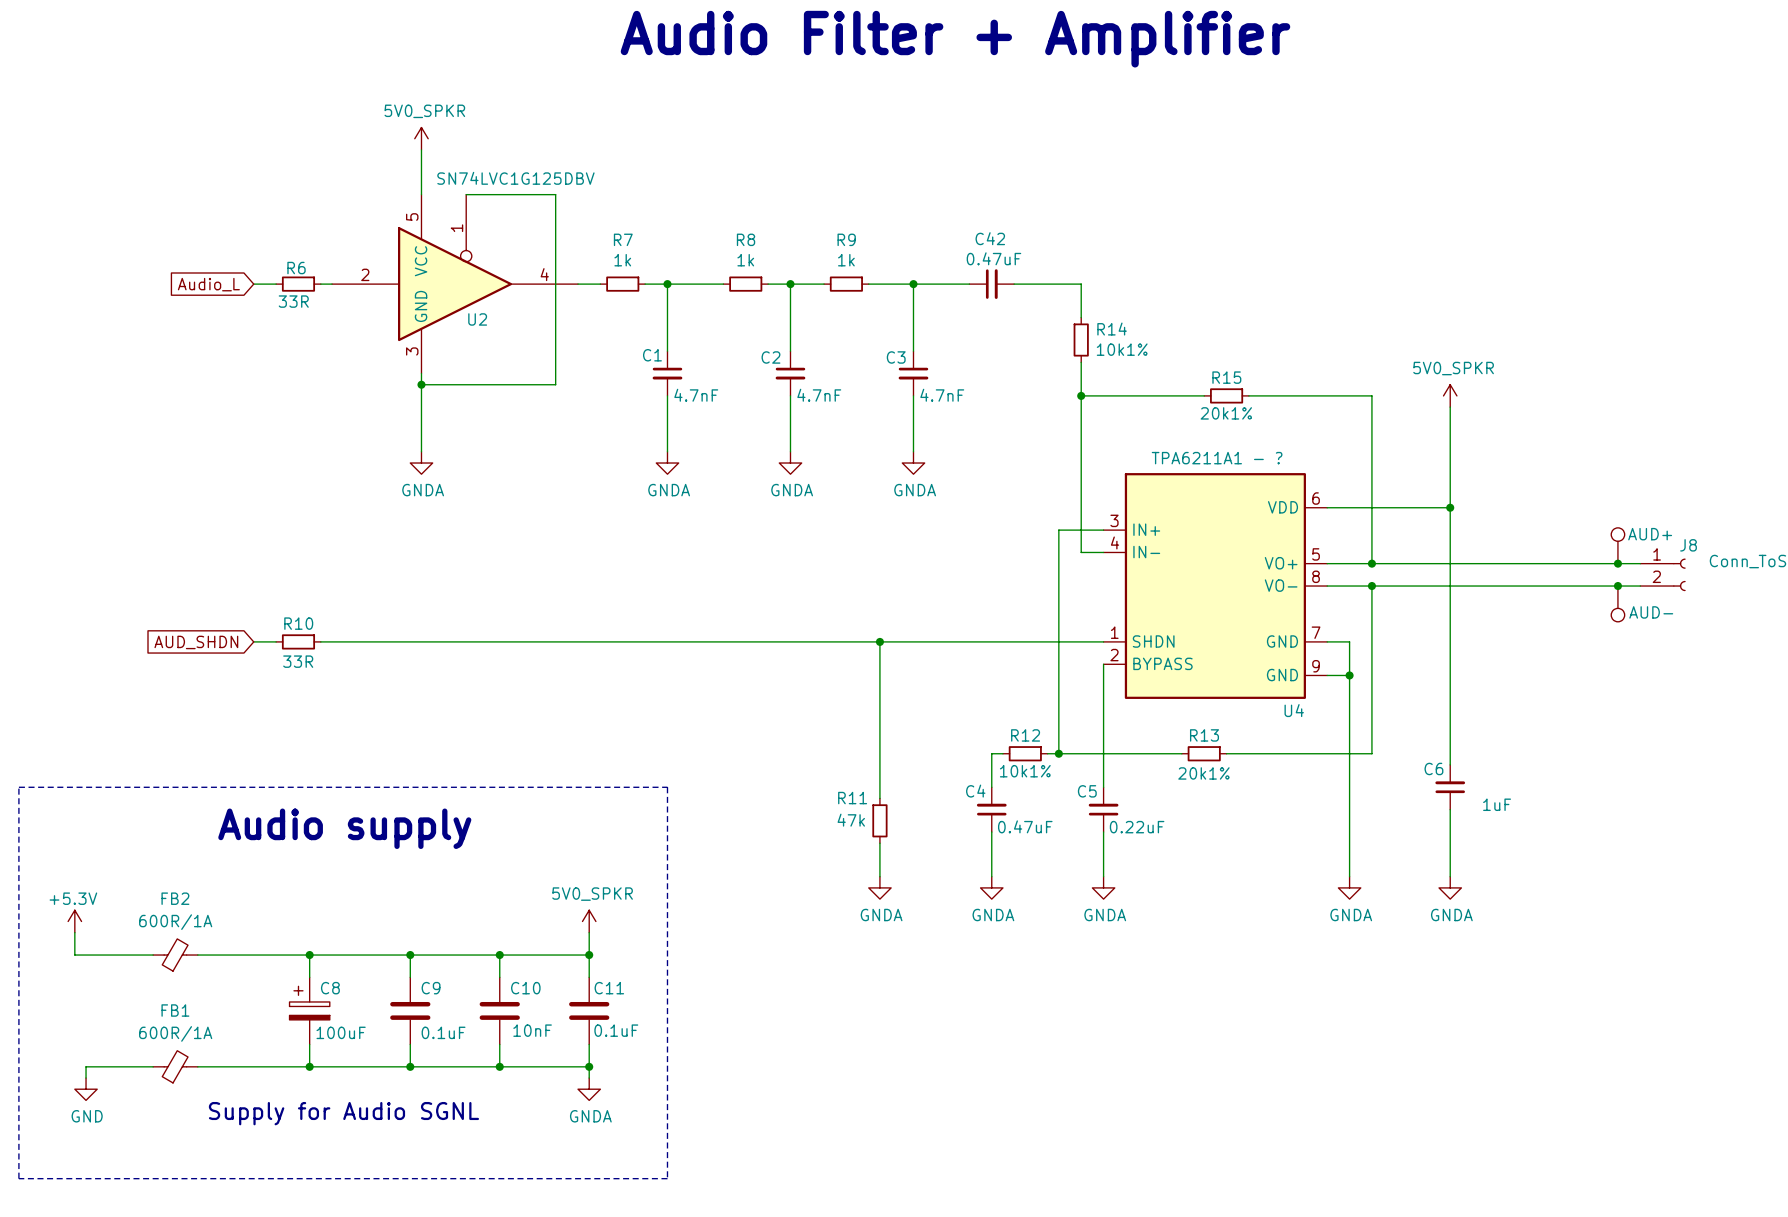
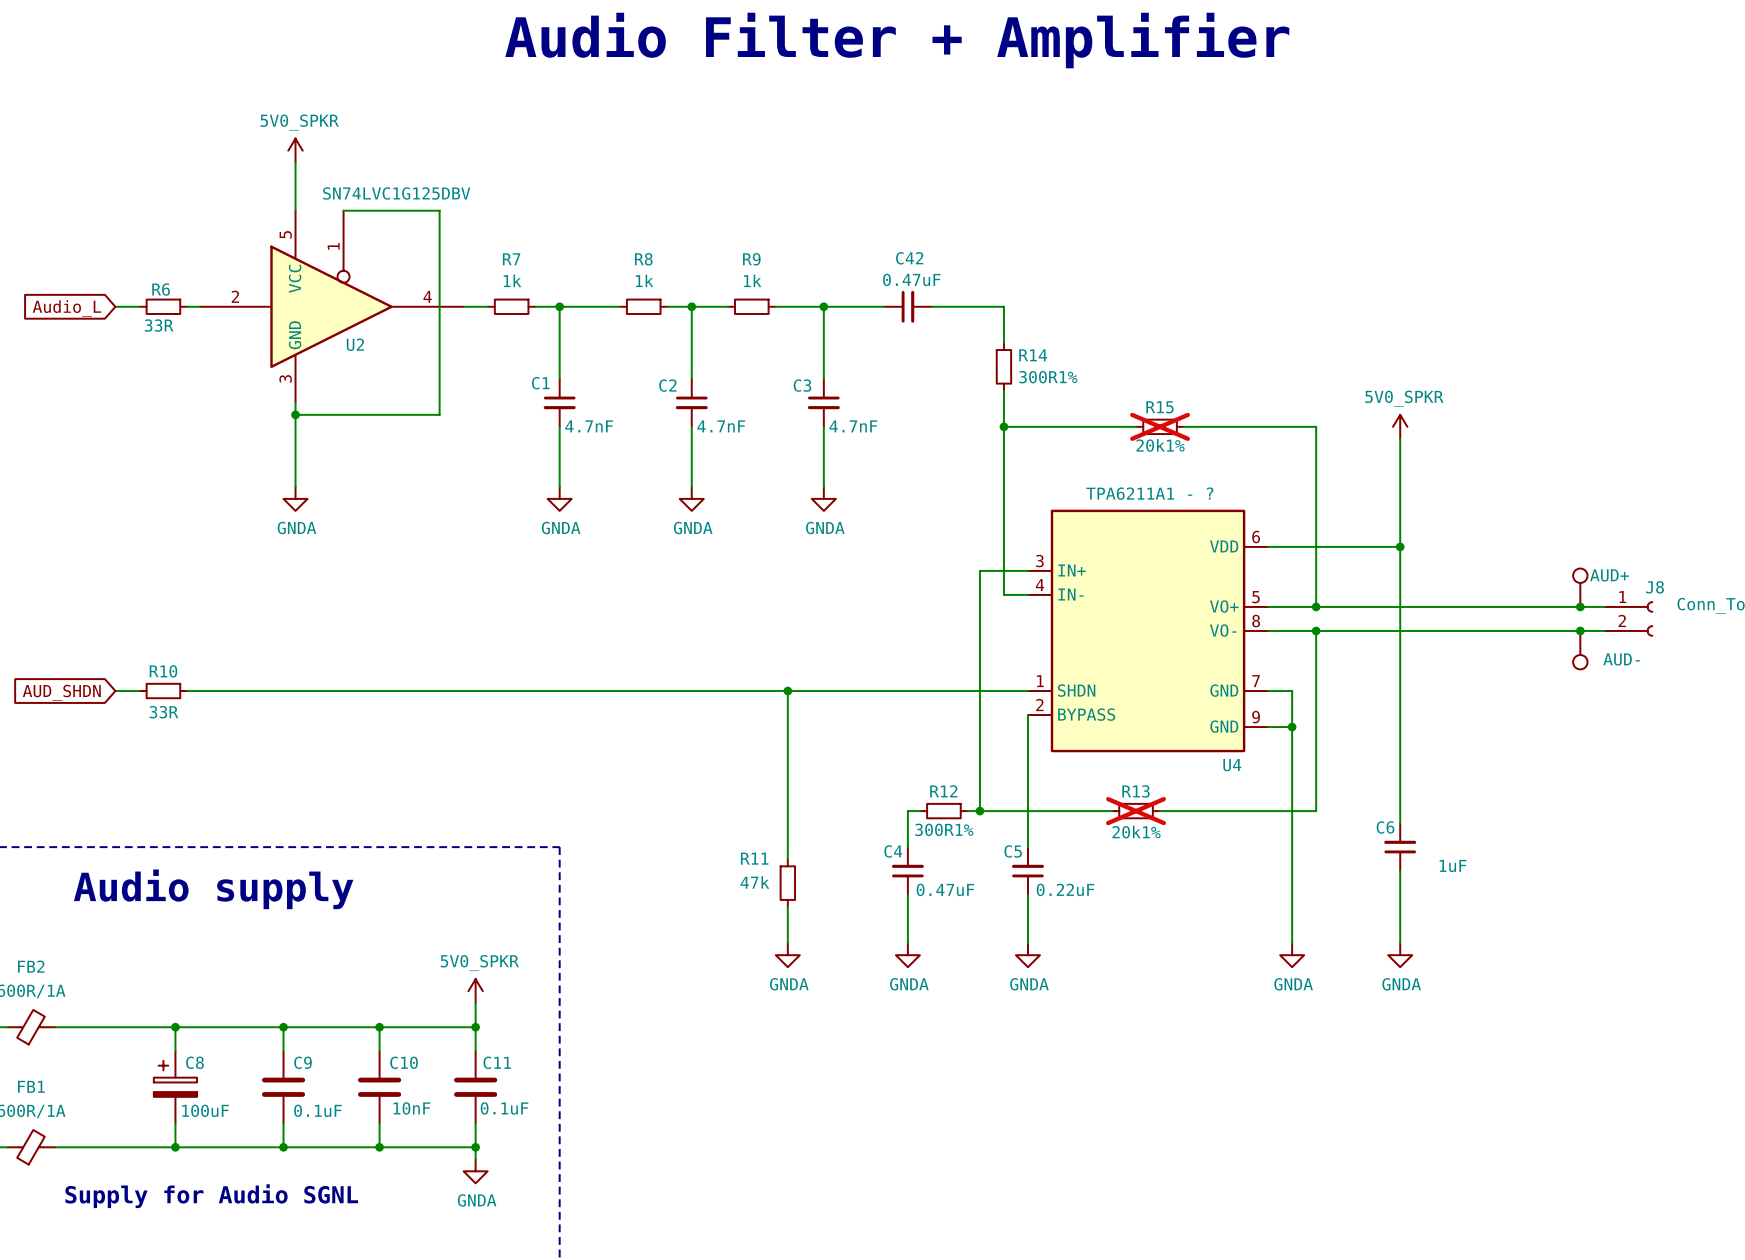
R14 value: 10k1% (1122, 349) -> 300R1% (1048, 377)
R15 do-not-place cross: none -> (1160, 426)
R13 do-not-place cross: none -> (1136, 811)
R12 value: 10k1% (1025, 771) -> 300R1% (944, 829)

